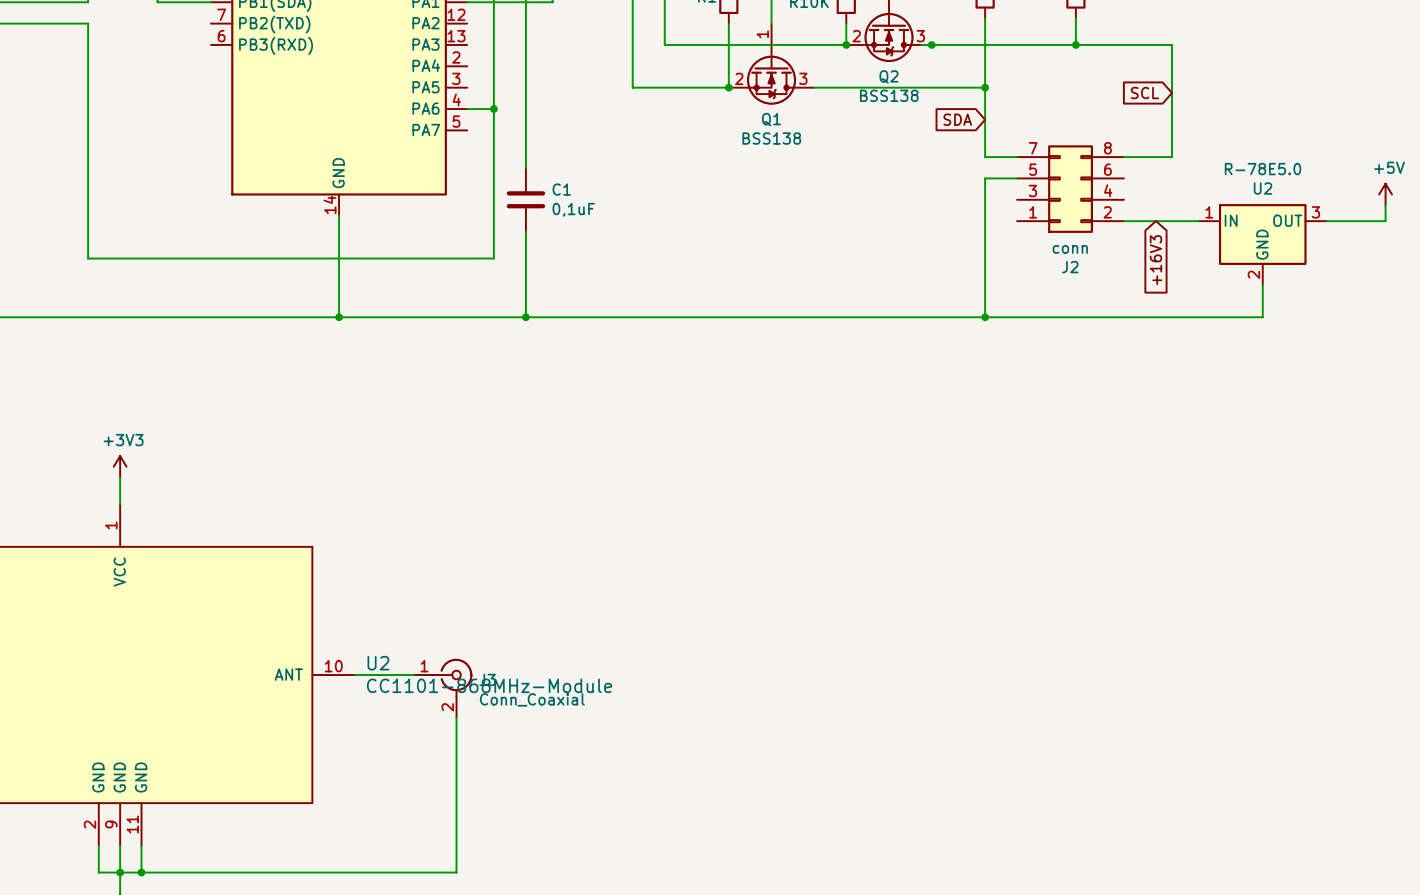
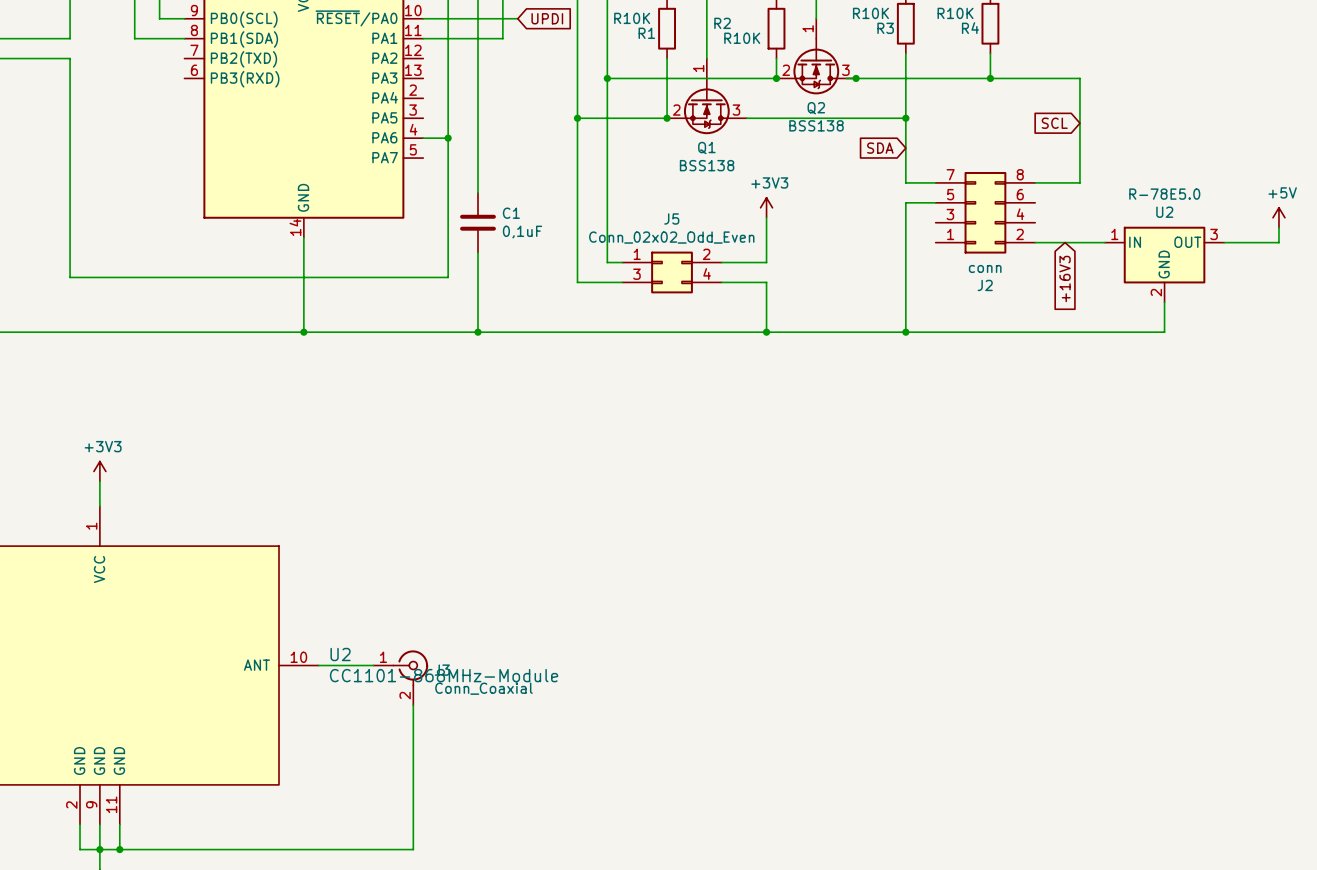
wire: none -> (607, 78) (607, 262) (622, 262)
junction: none -> (607, 78)
wire: none -> (577, 118) (577, 282) (622, 282)
junction: none -> (577, 118)
power symbol: none -> +3V3 (766, 207)
wire: none -> (766, 217) (766, 262) (721, 262)
J5: none -> Conn_02x02_Odd_Even (672, 272)
wire: none -> (721, 282) (766, 282) (766, 332)
junction: none -> (766, 332)

